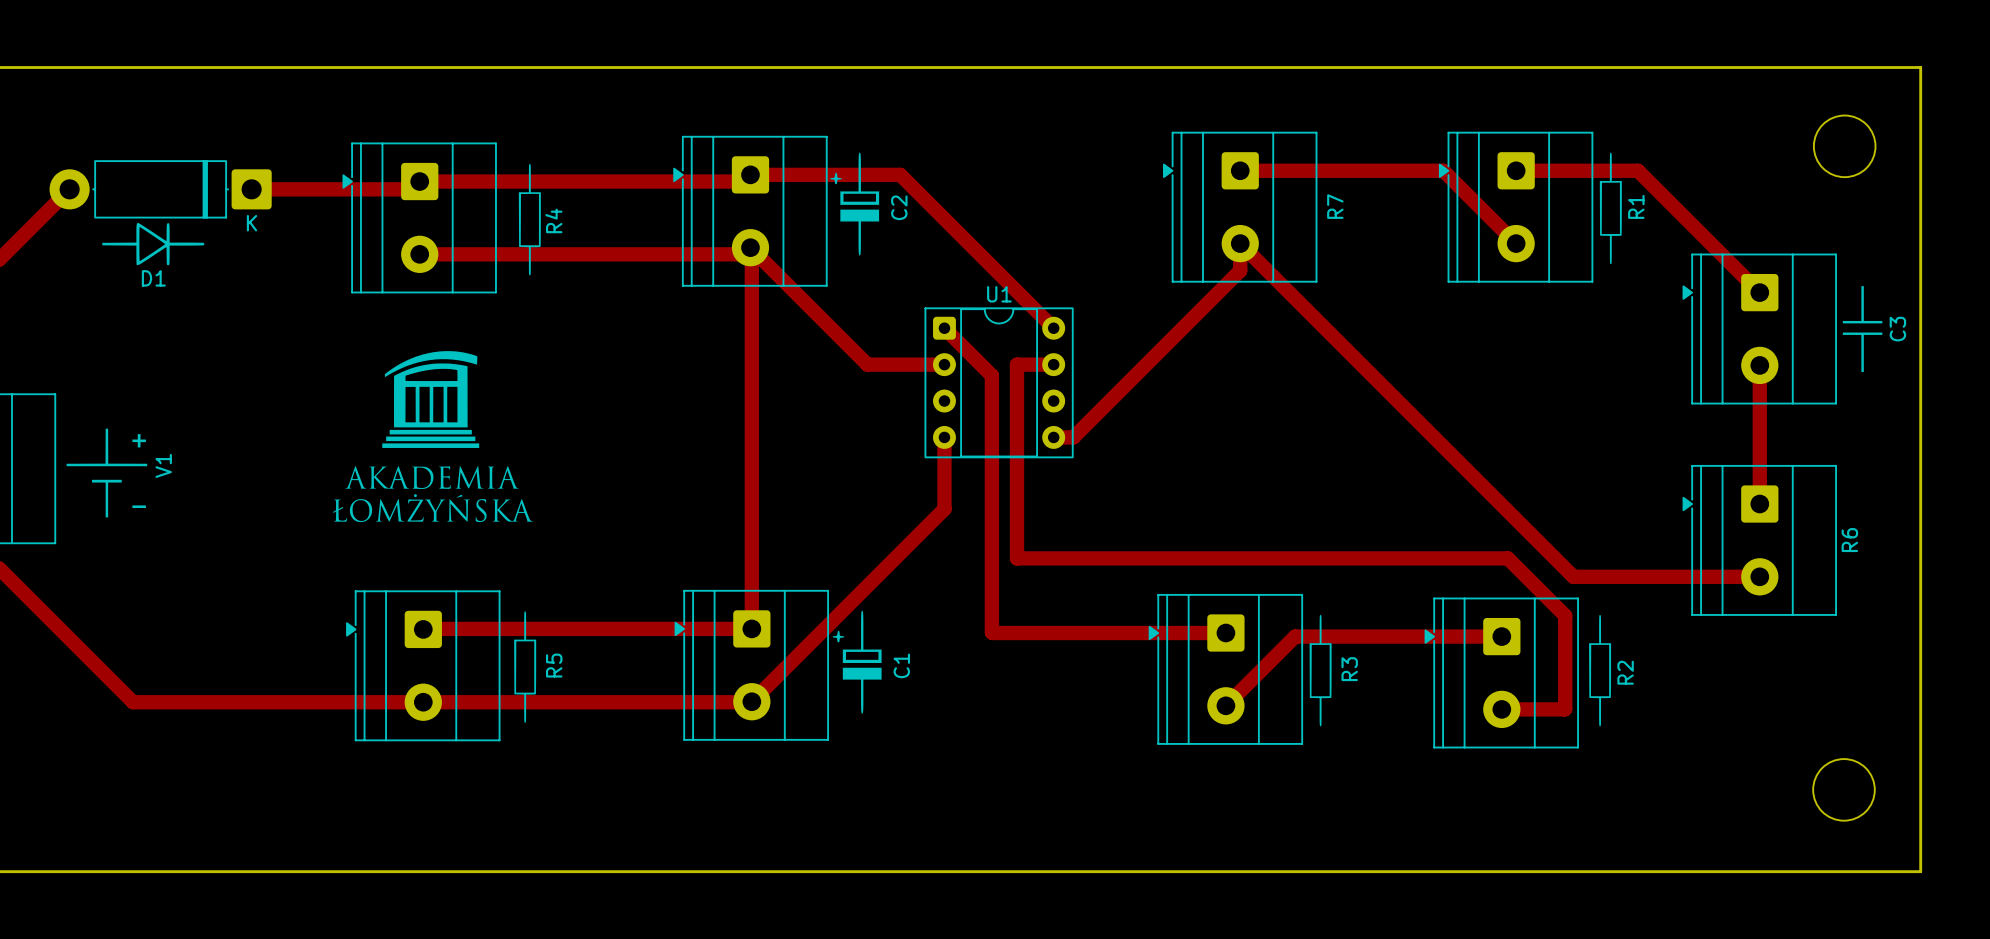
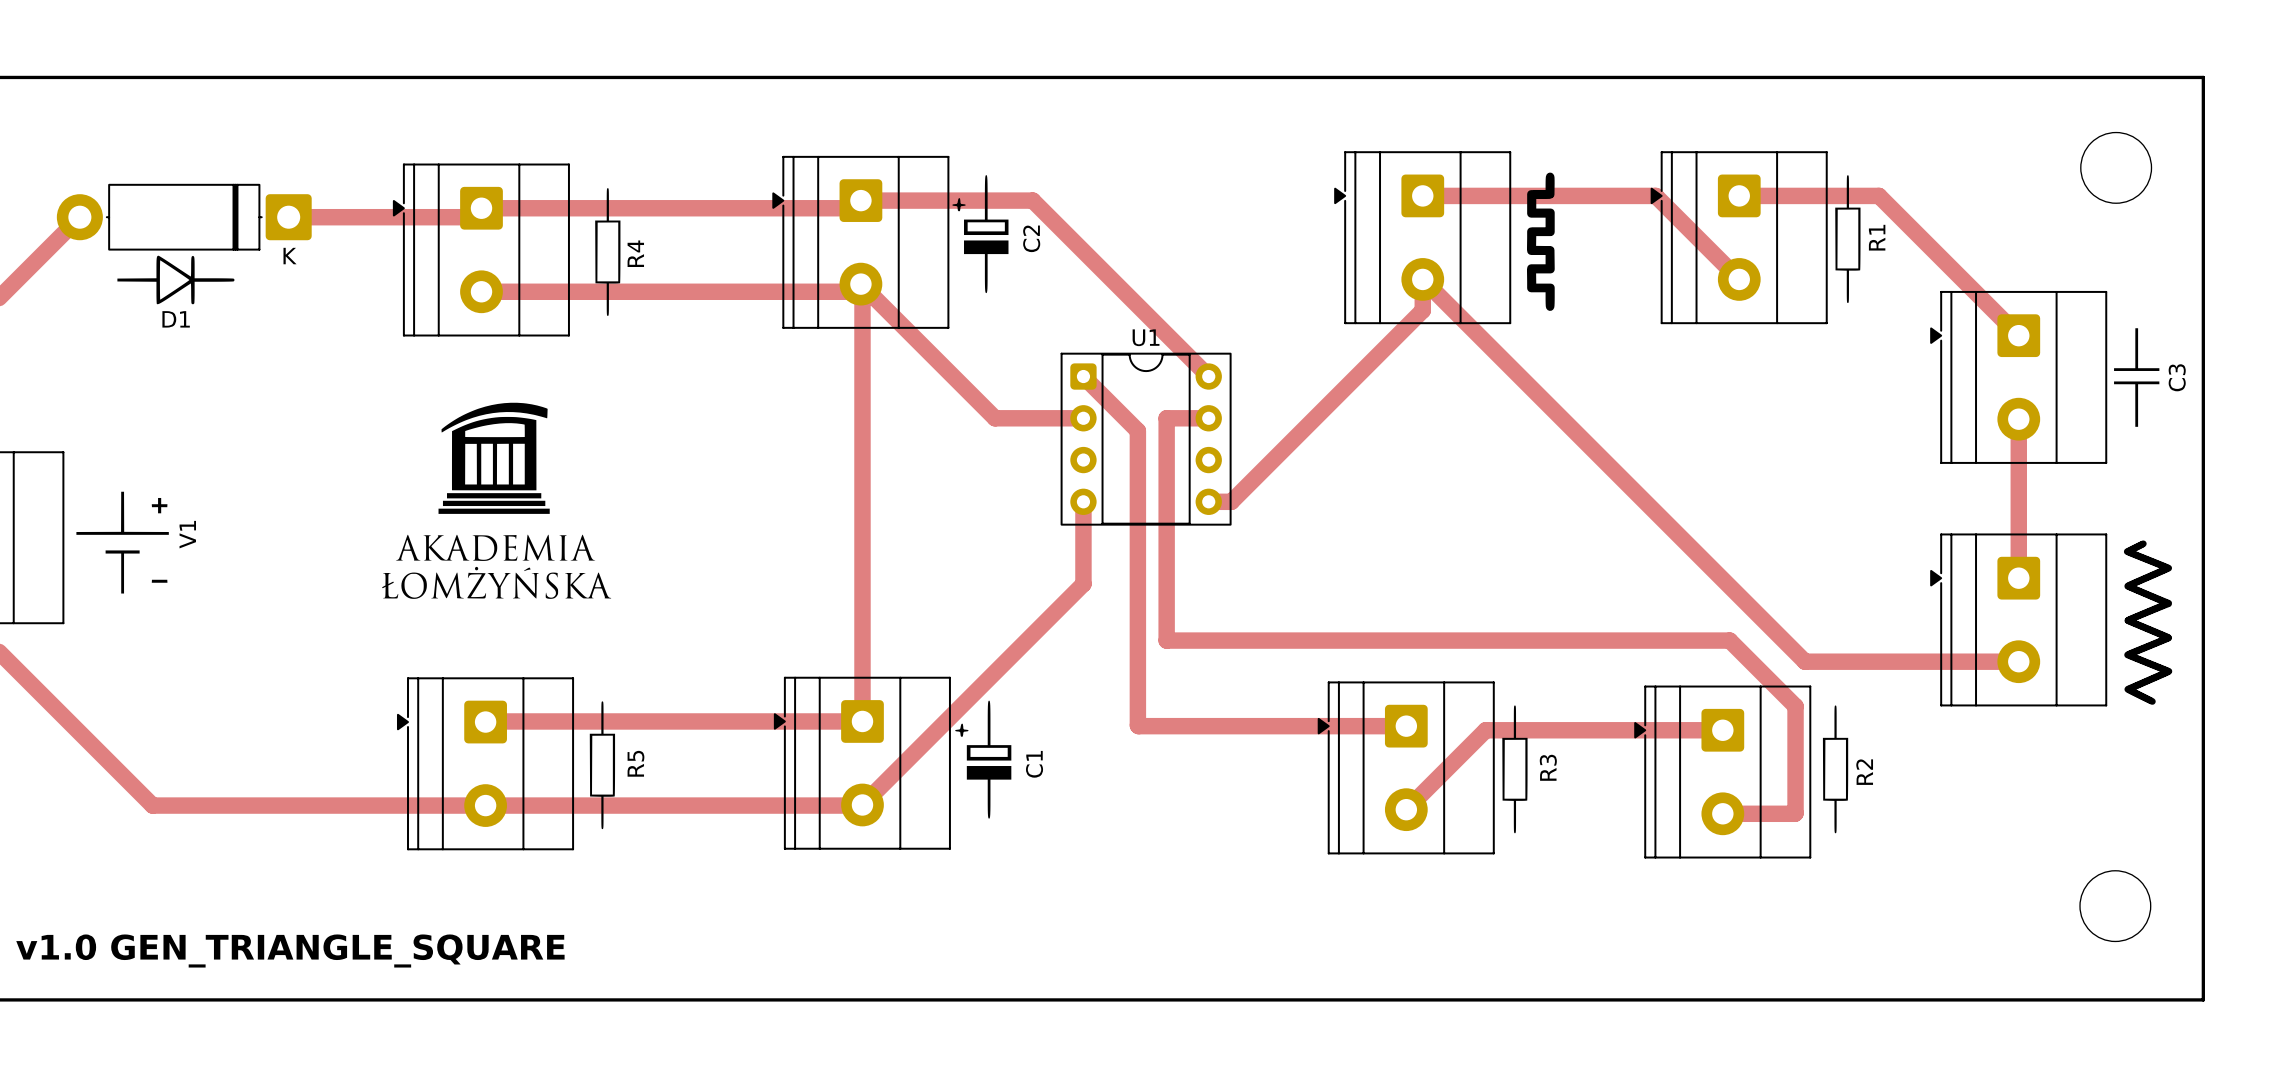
drawing: none -> [1527, 172, 1555, 311]
R7 name: R7 (1335, 206) -> none
drawing: none -> [2123, 540, 2173, 705]
R6 name: R6 (1849, 540) -> none
text: none -> v1.0 GEN_TRIANGLE_SQUARE (290, 951)

